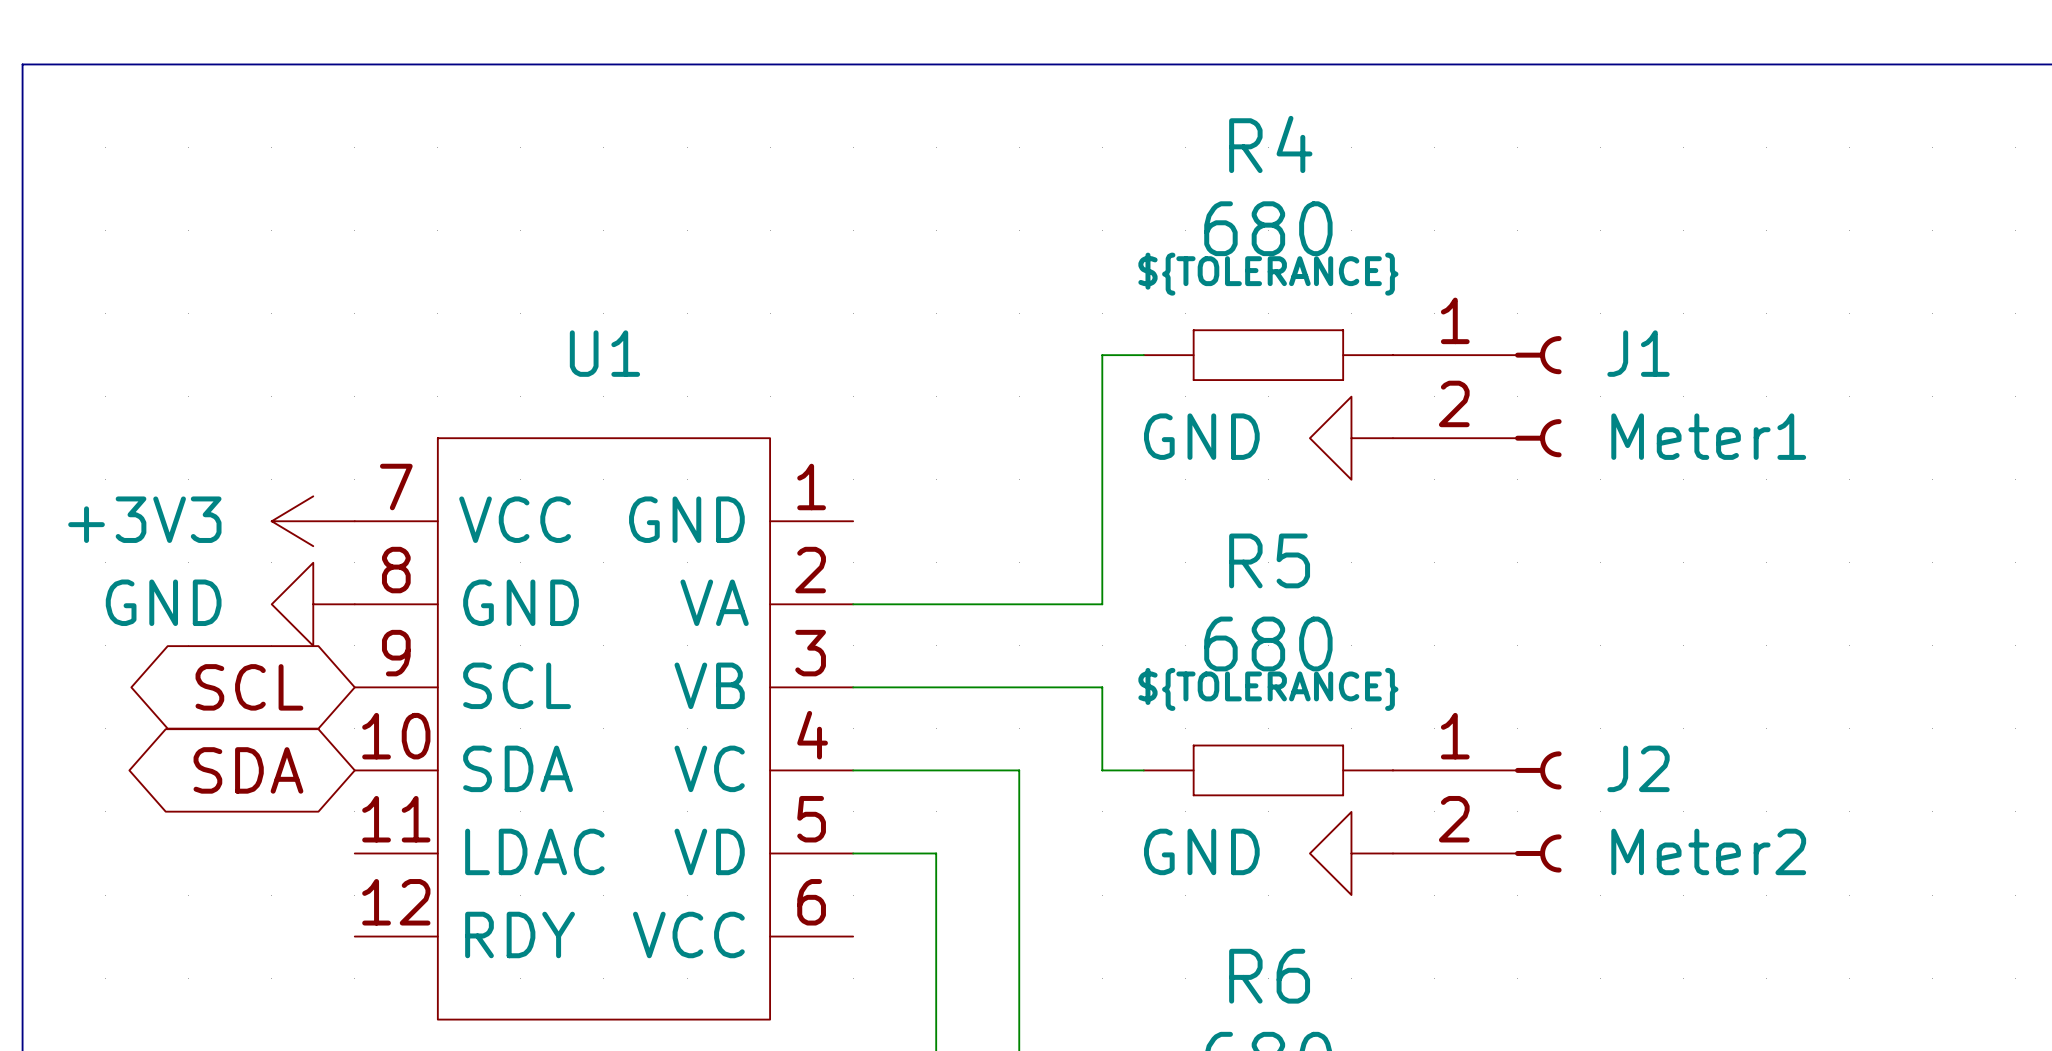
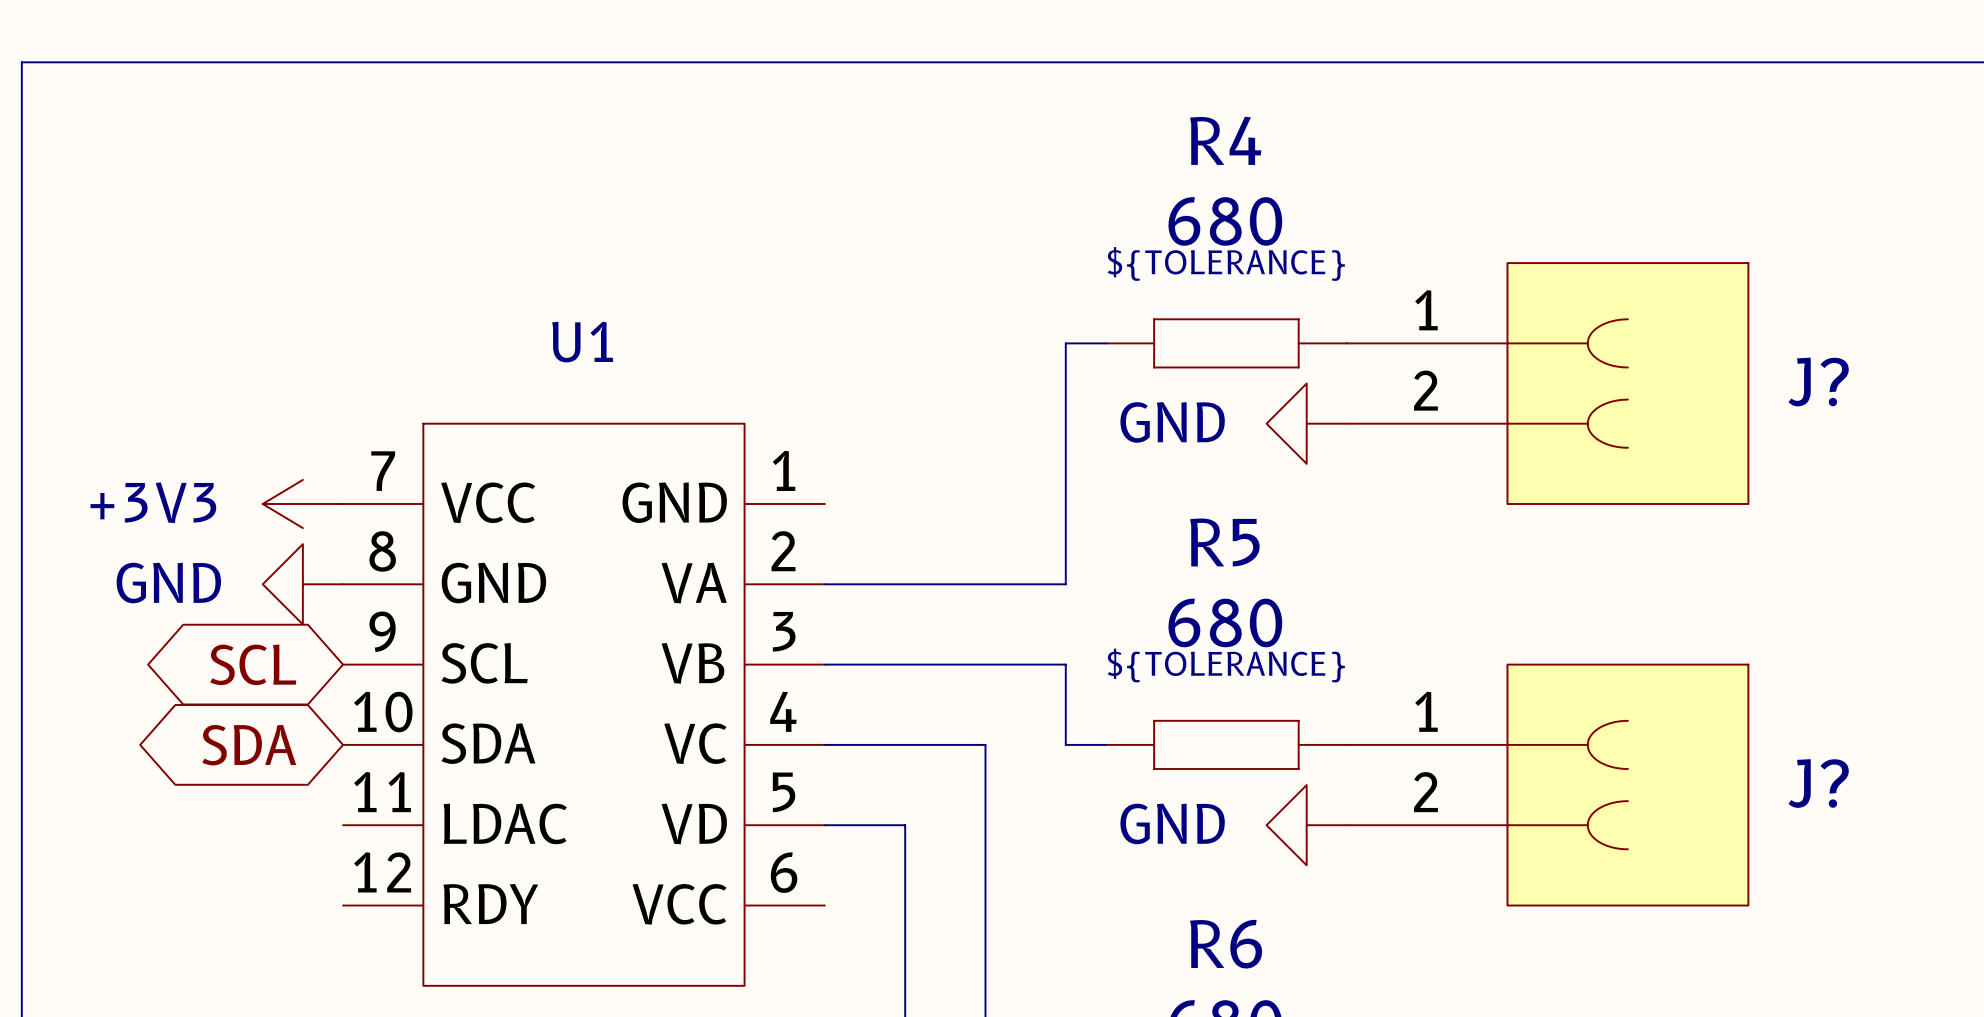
J1: Meter1 (1477, 396) -> none
J?: none -> (1547, 383)
J2: Meter2 (1477, 811) -> none
J?: none -> (1547, 785)

